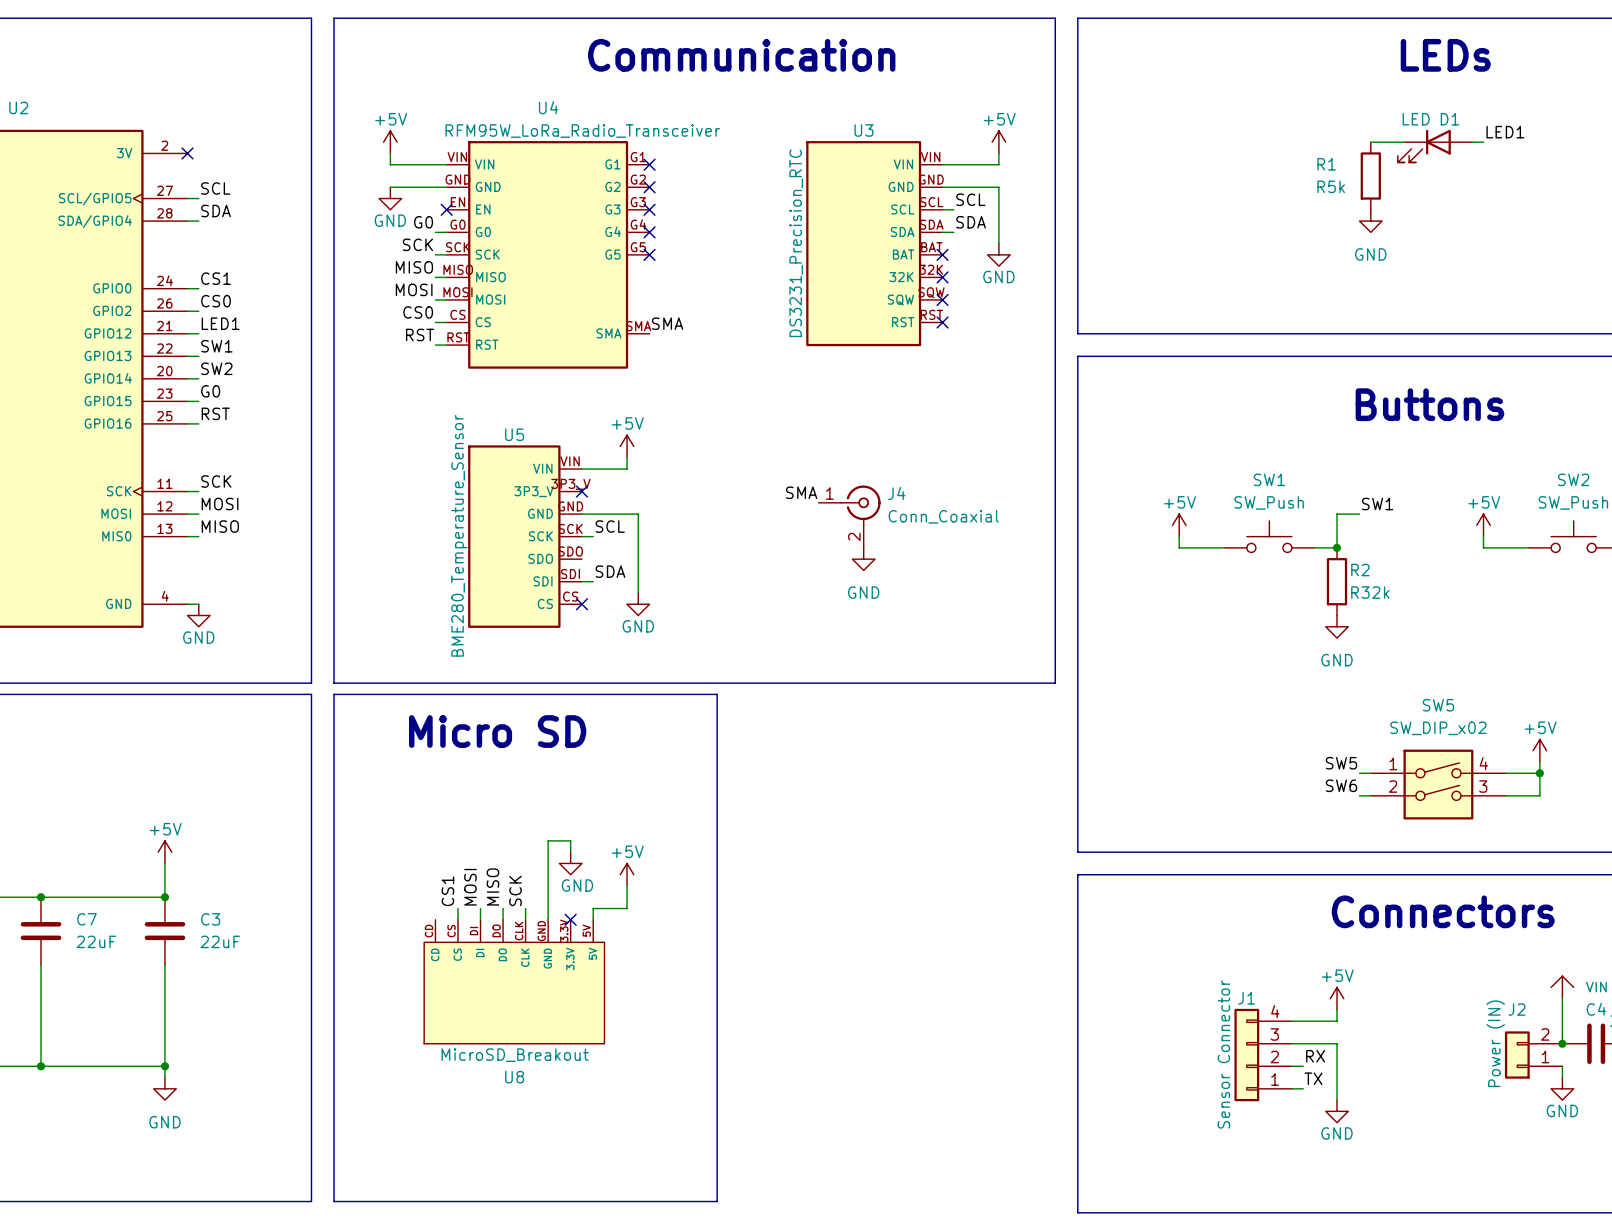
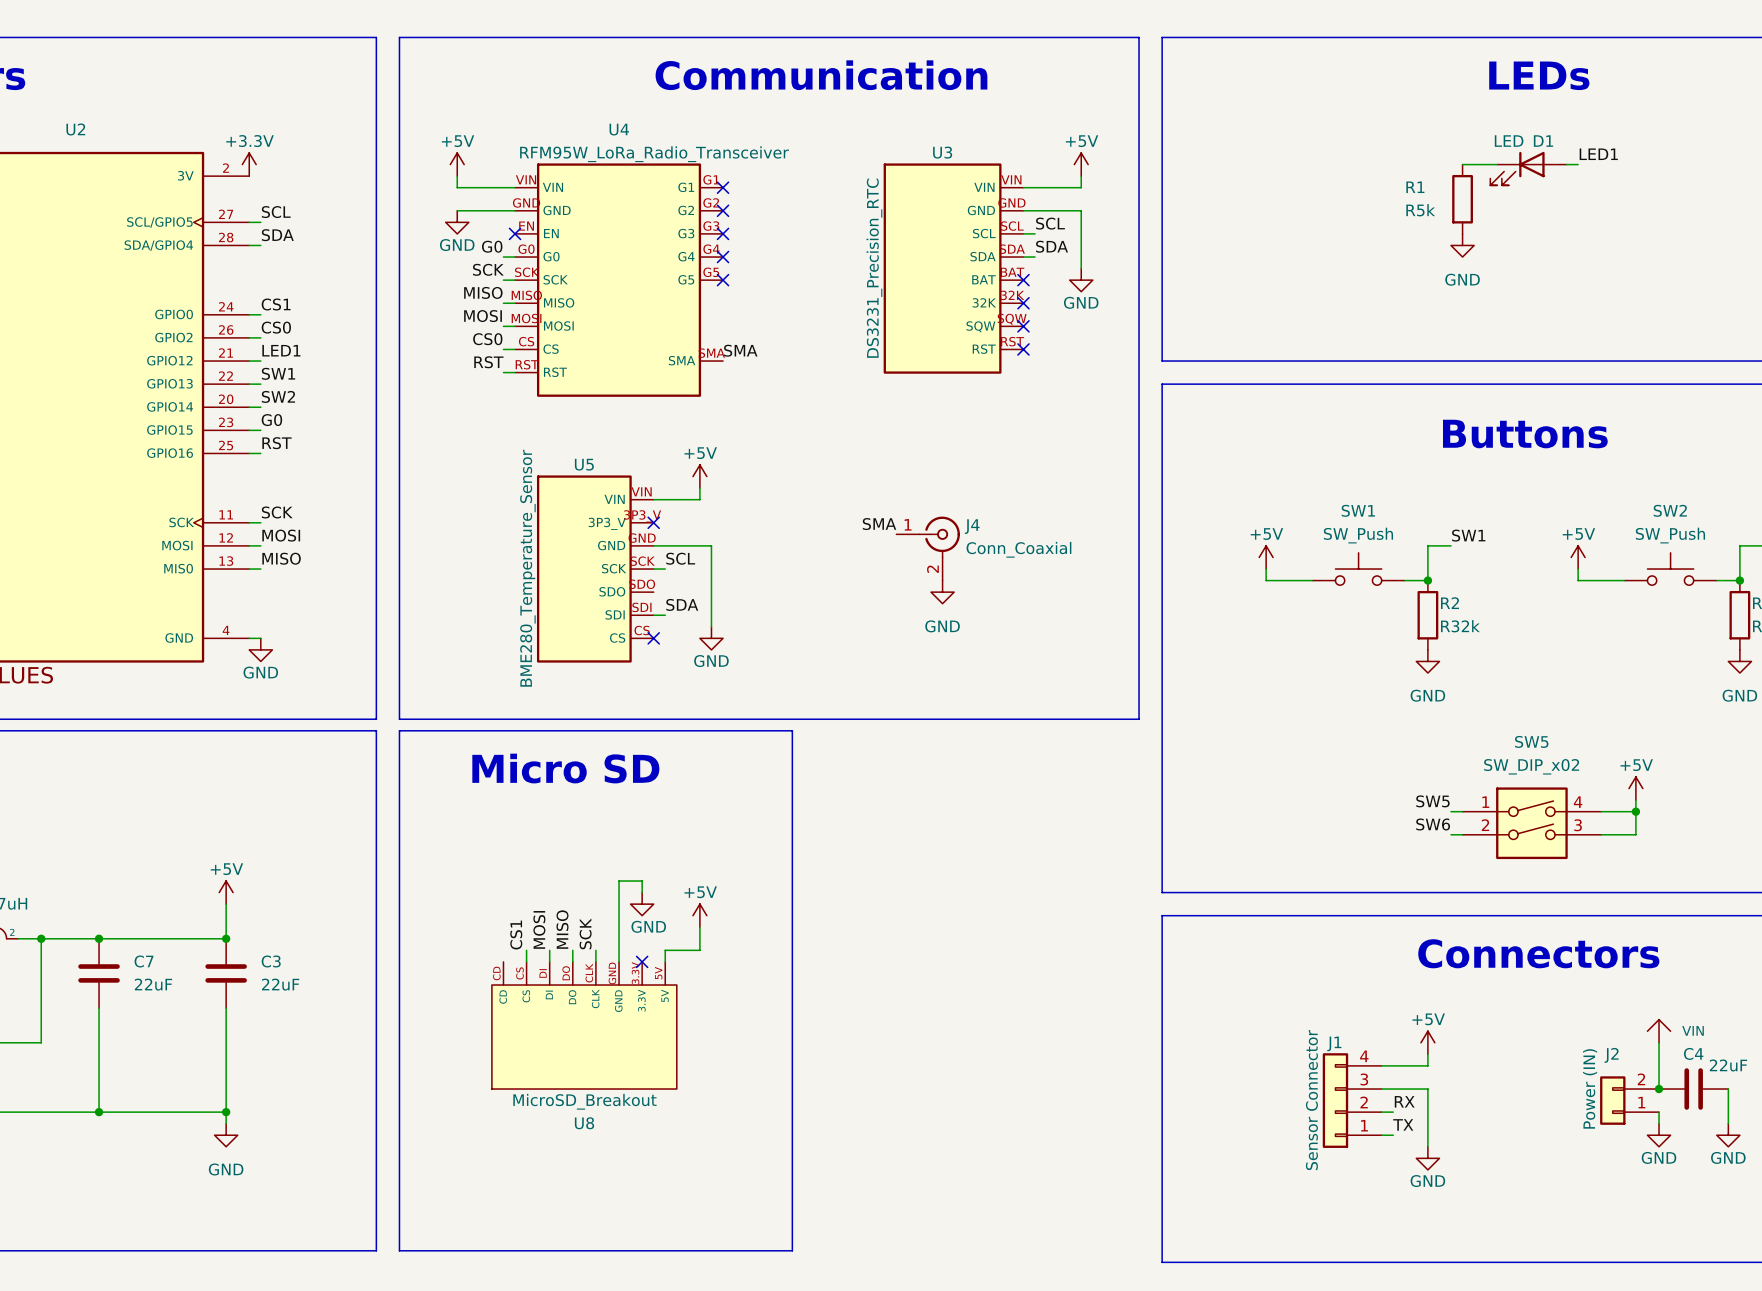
power symbol: none -> +3.3V (249, 164)
no-connect mark: (187, 153) -> none

